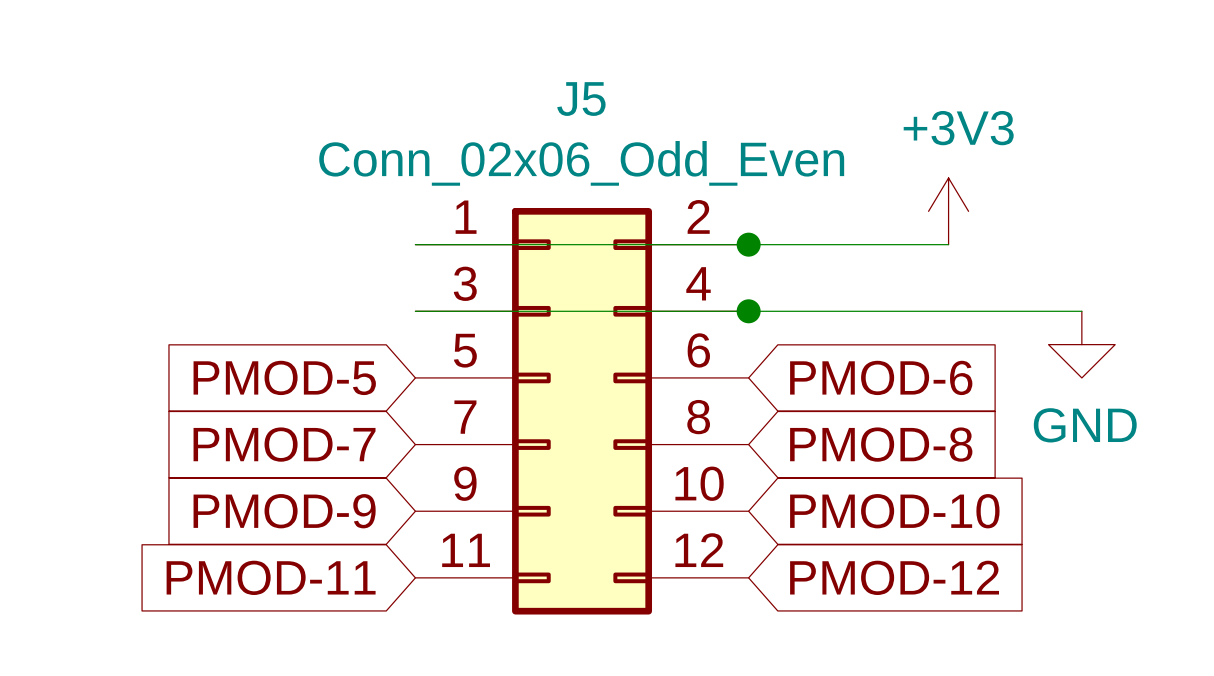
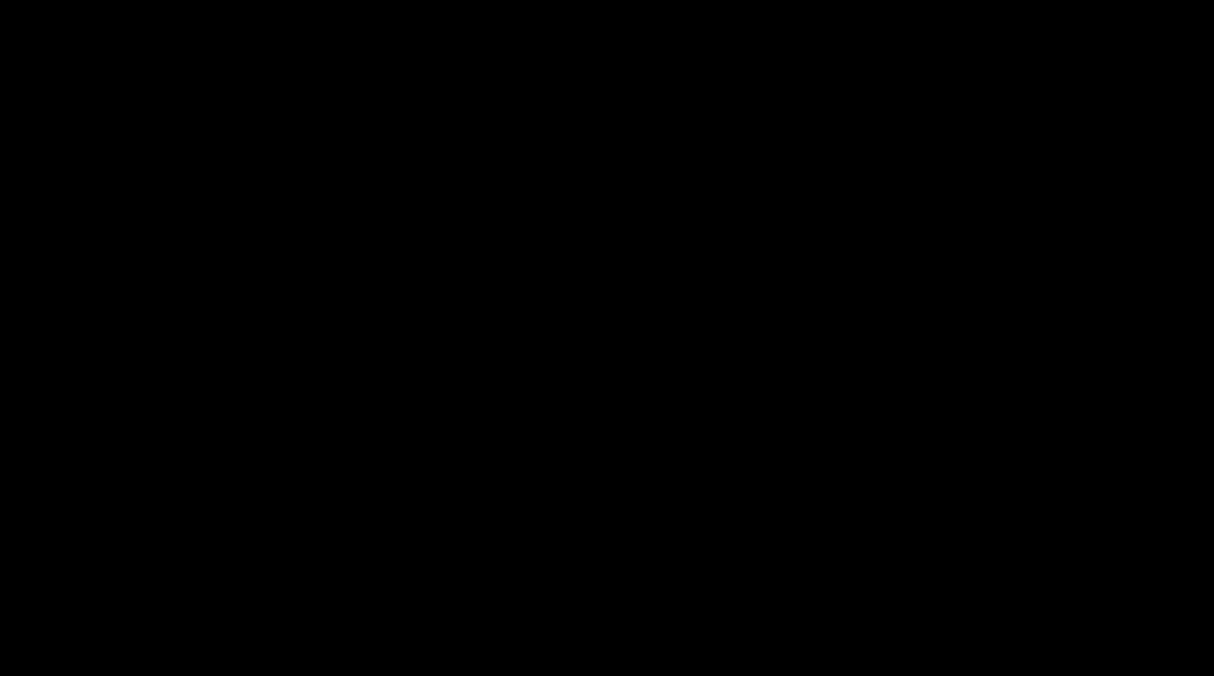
power symbol: +3V3 (948, 211) -> none
wire: (415, 244) (948, 244) -> none
junction: (748, 244) -> none
wire: (415, 311) (1081, 311) -> none
junction: (748, 311) -> none
power symbol: GND (1081, 344) -> none
global label: PMOD-5 (284, 377) -> none
global label: PMOD-6 (881, 377) -> none
J5: Conn_02x06_Odd_Even (582, 411) -> none
global label: PMOD-7 (284, 444) -> none
global label: PMOD-8 (881, 444) -> none
global label: PMOD-9 (284, 511) -> none
global label: PMOD-10 (894, 511) -> none
global label: PMOD-11 (271, 577) -> none
global label: PMOD-12 (894, 577) -> none

